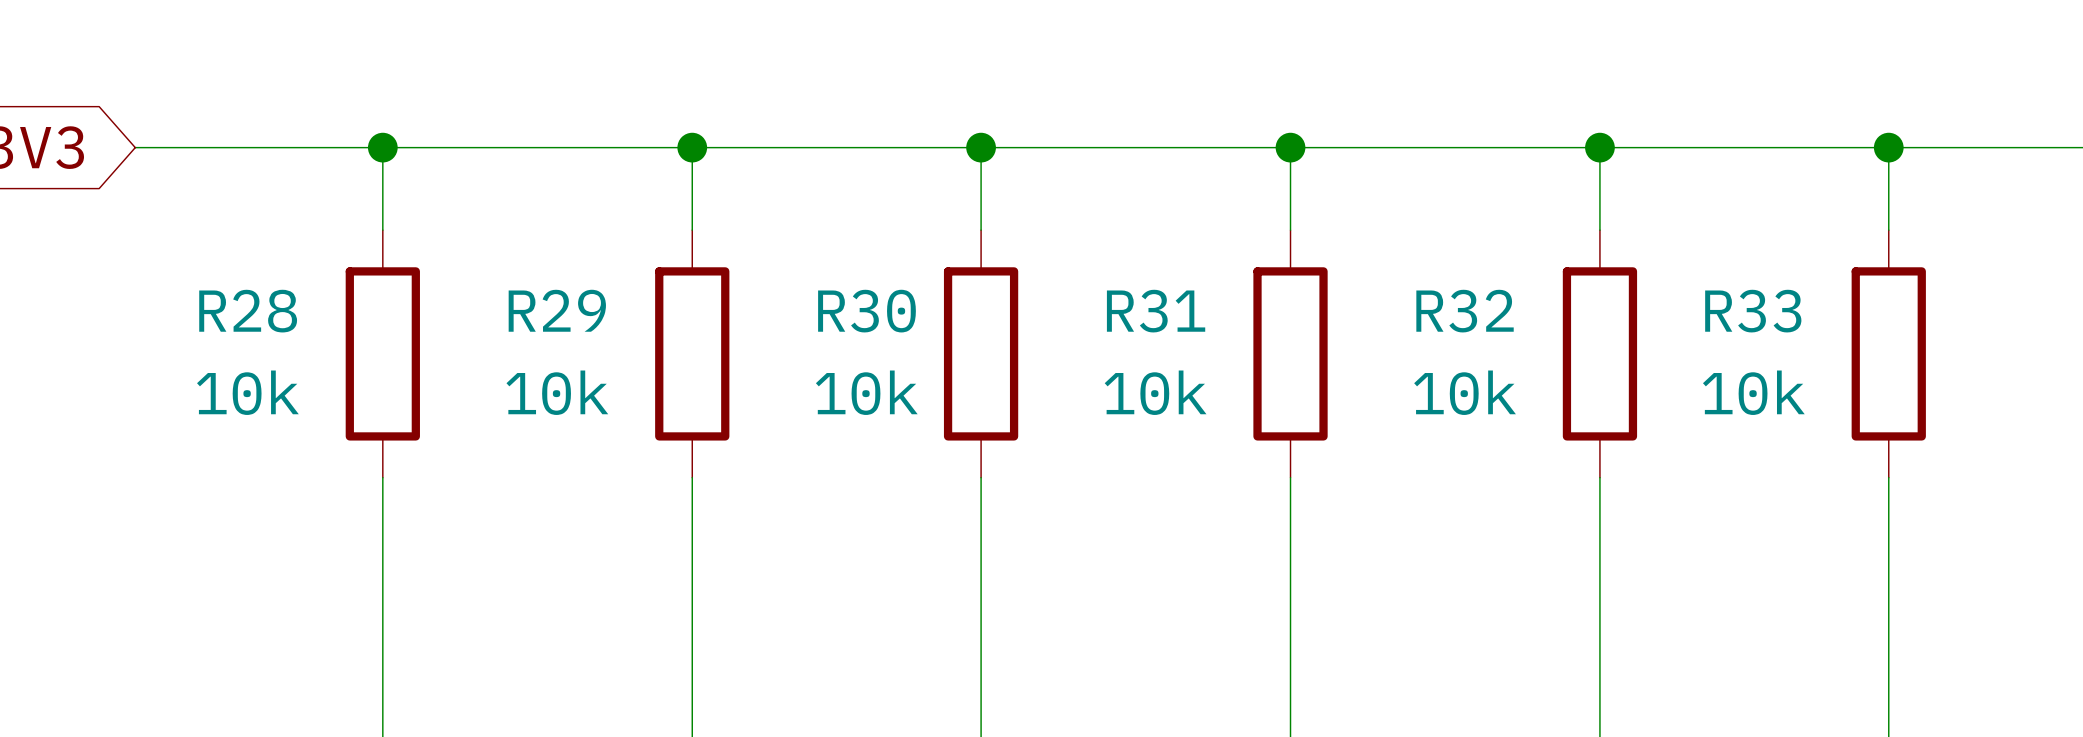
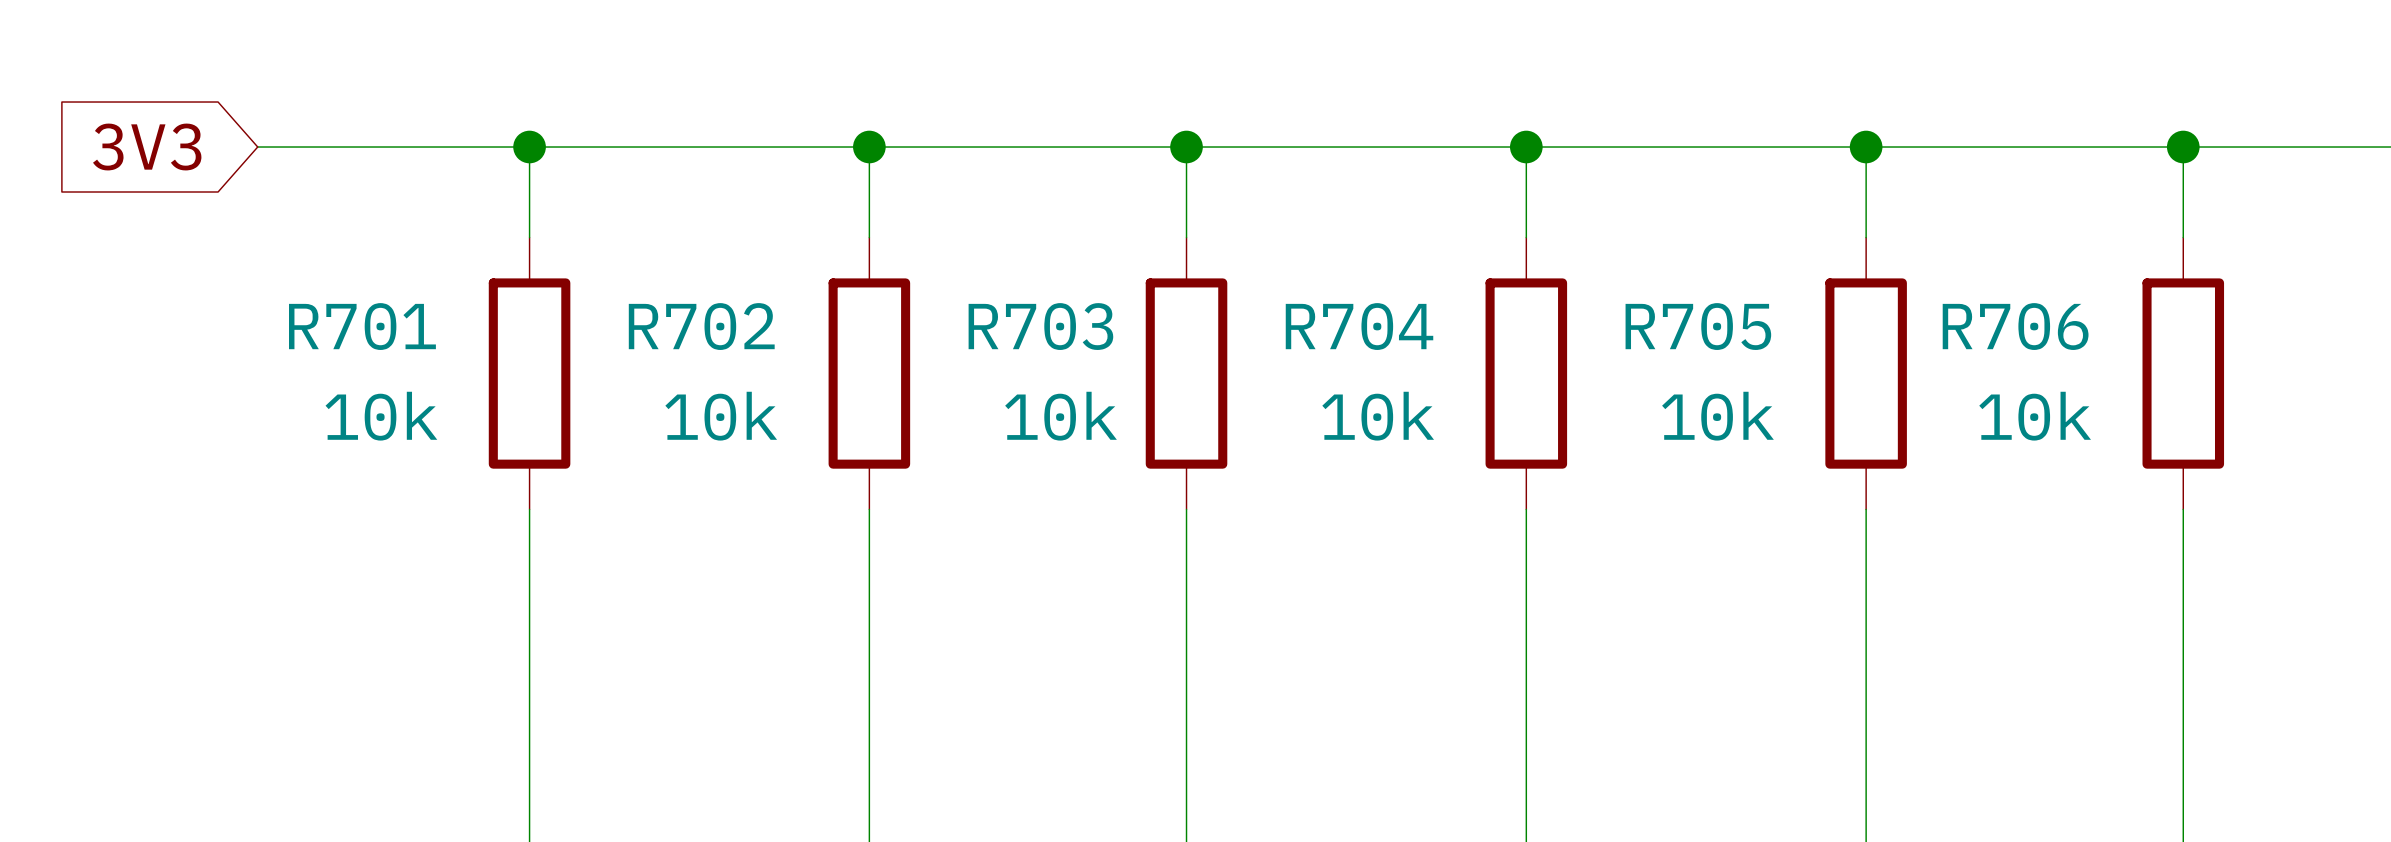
R29 name: R29 (557, 310) -> R702 (701, 326)
R28 name: R28 (248, 311) -> R701 (362, 326)
R30 name: R30 (866, 311) -> R703 (1040, 326)
R31 name: R31 (1156, 311) -> R704 (1359, 326)
R32 name: R32 (1465, 311) -> R705 (1698, 326)
R33 name: R33 (1753, 311) -> R706 (2015, 326)

